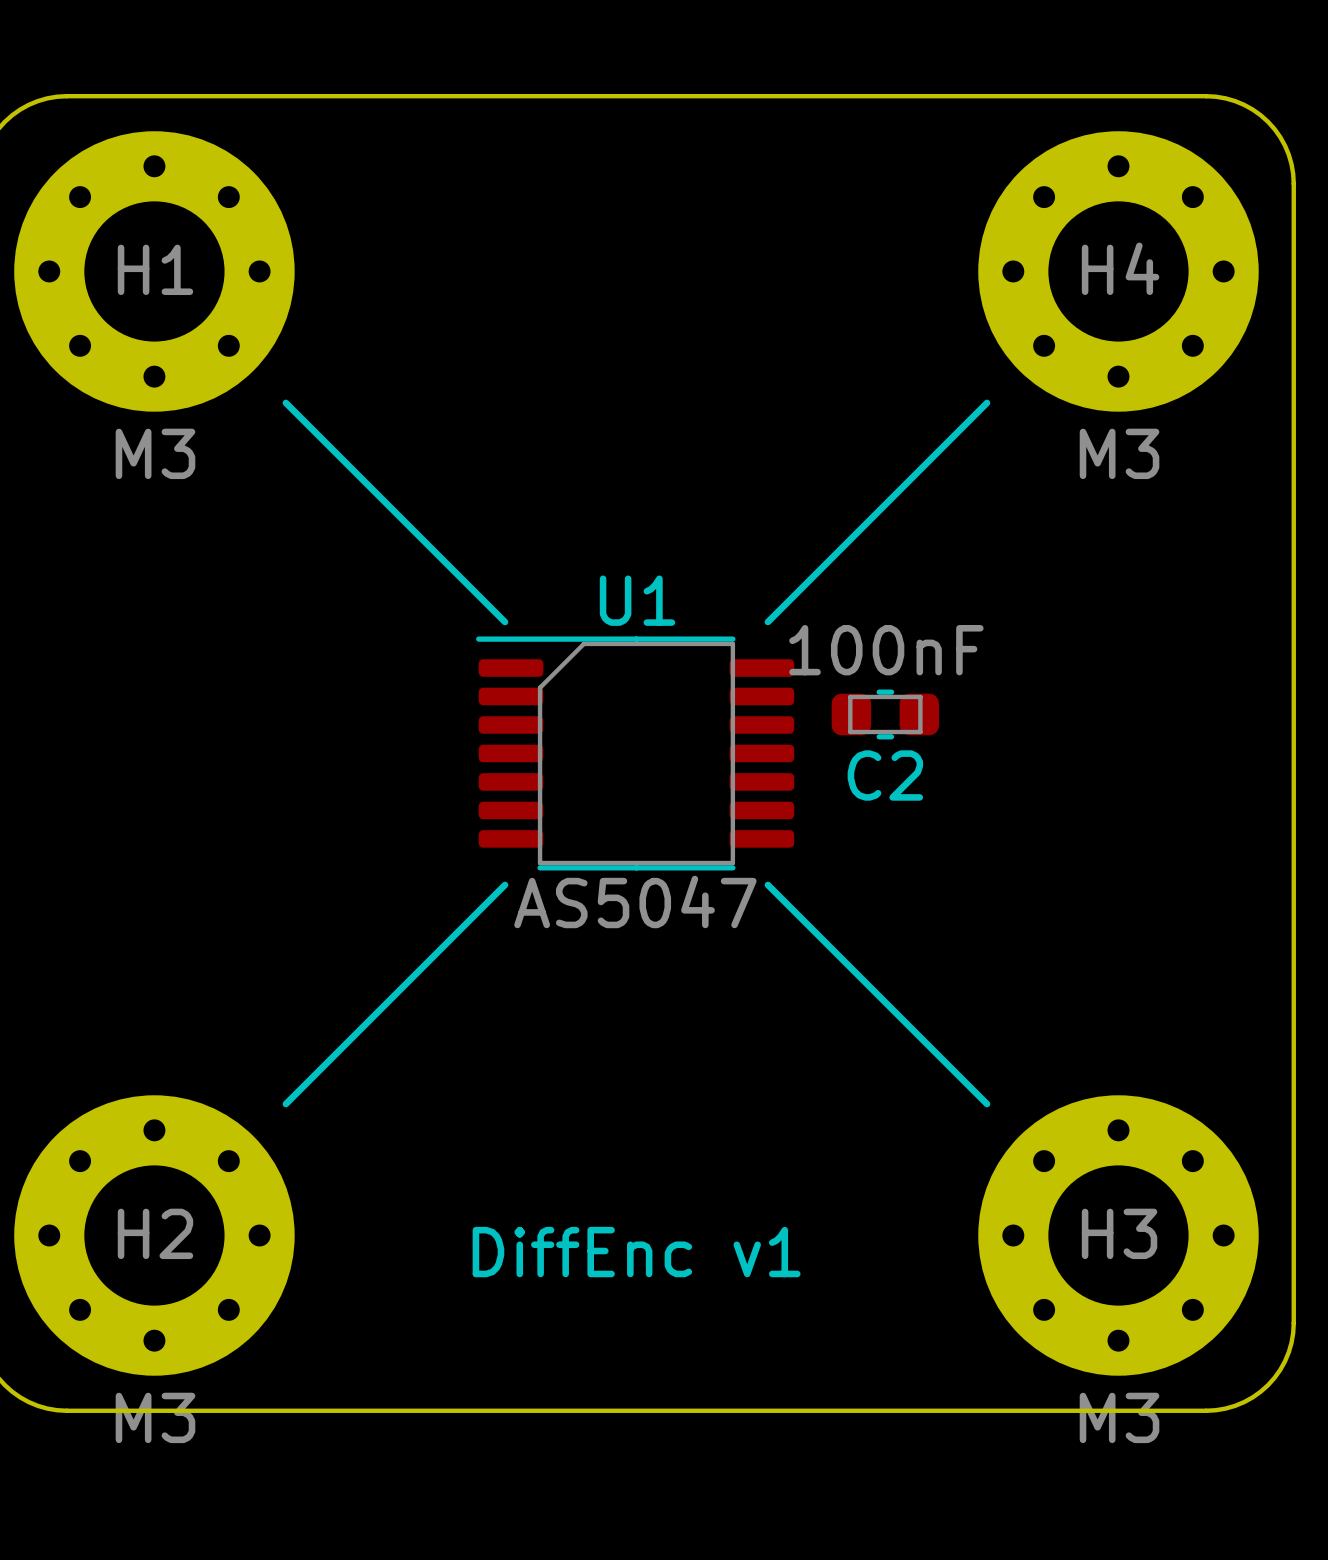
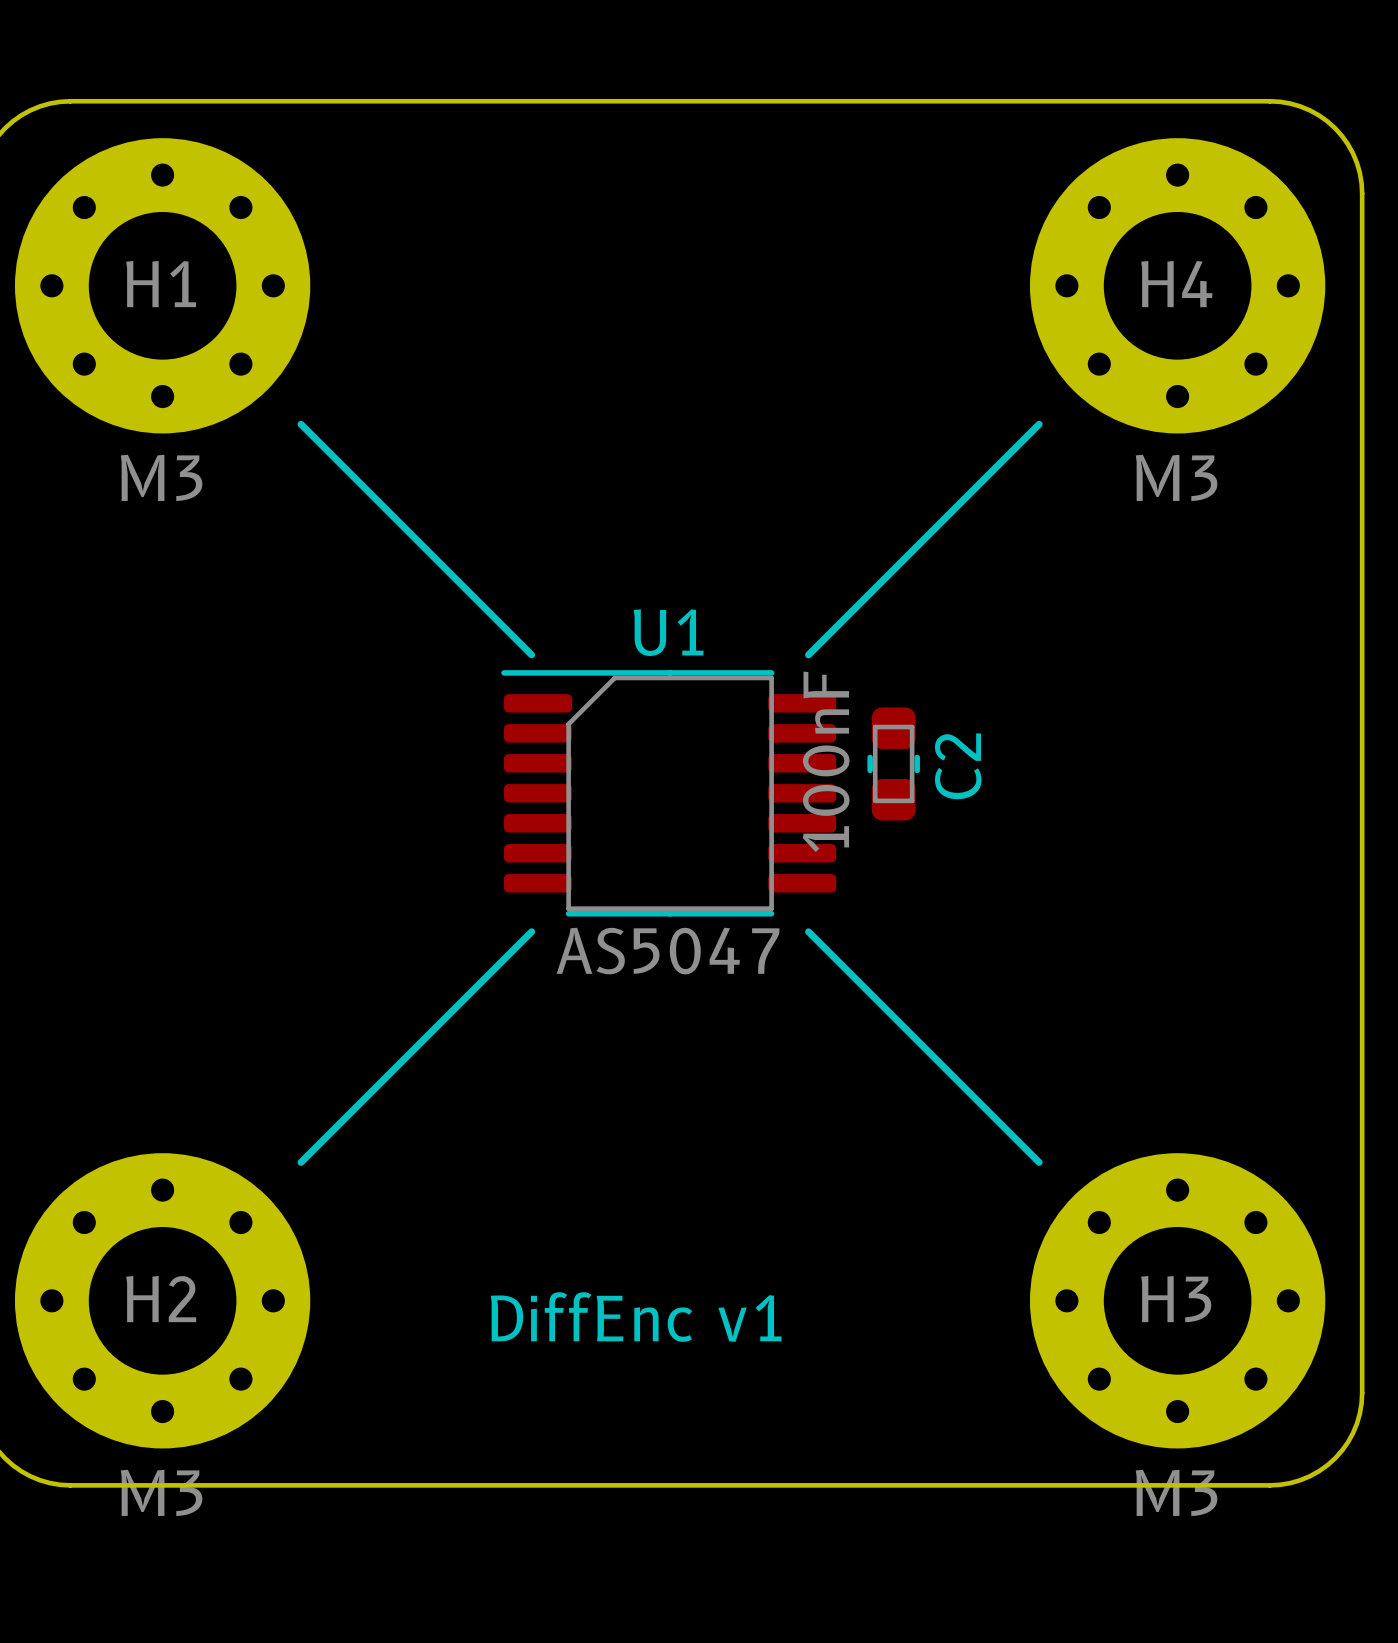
C2 value position: 100nF (886, 650) -> 100nF (826, 761)
C2 rotation: 0° (885, 714) -> 90° clockwise (893, 763)
C2 name position: C2 (885, 775) -> C2 (958, 766)

